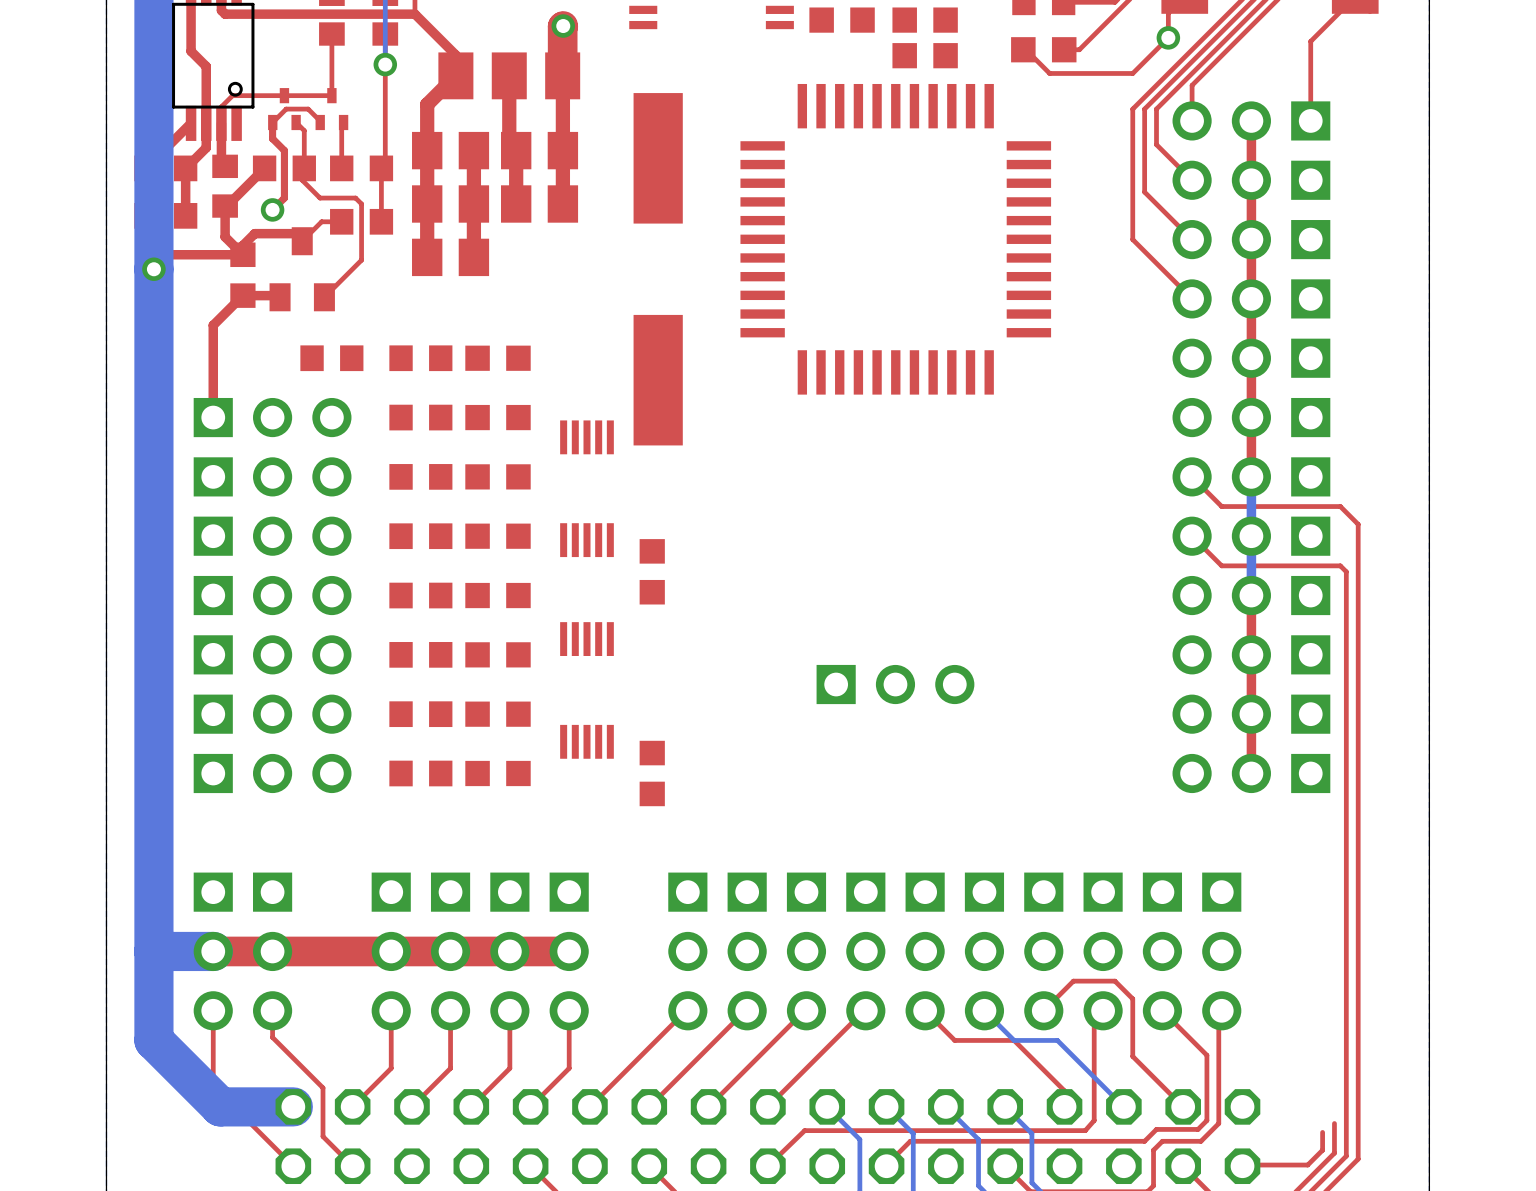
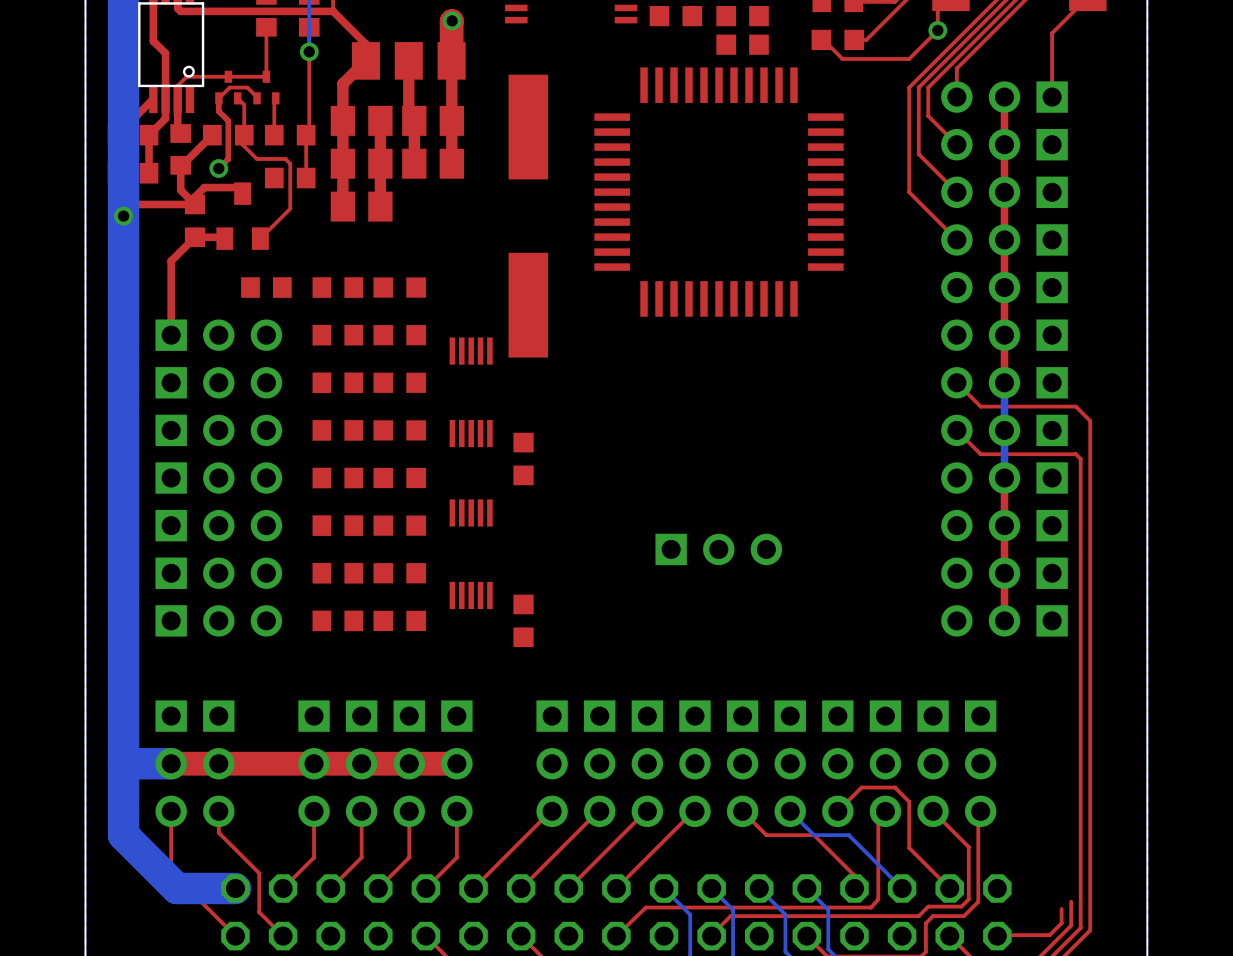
top track: (341, 221) (321, 221) (302, 241) -> none

